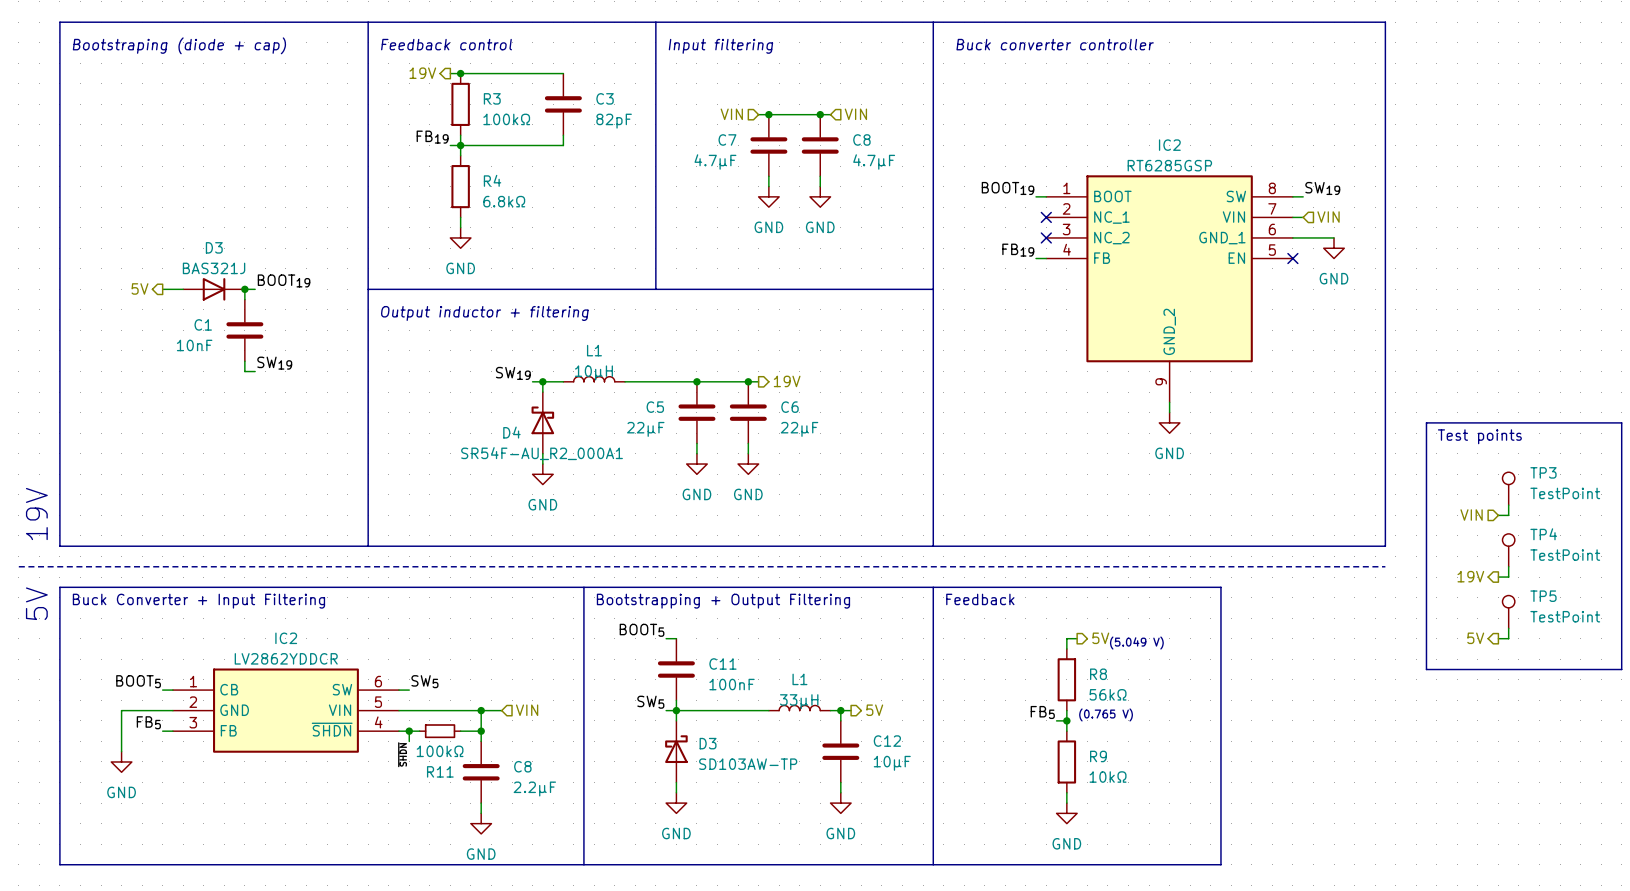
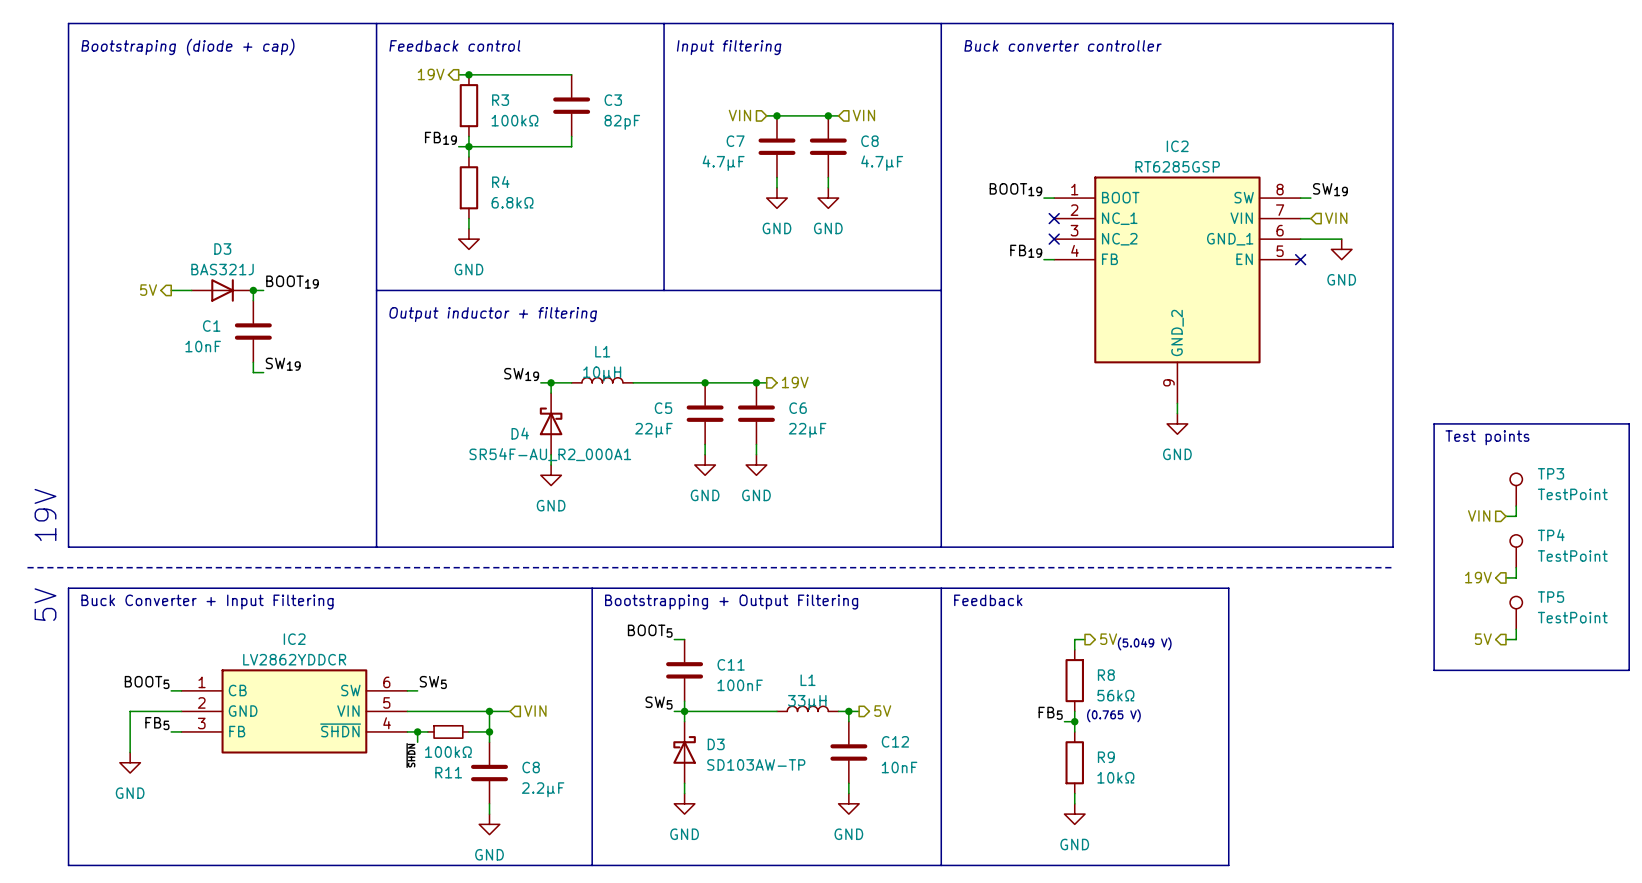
C12 value: 10μF (892, 763) -> 10nF (899, 767)

